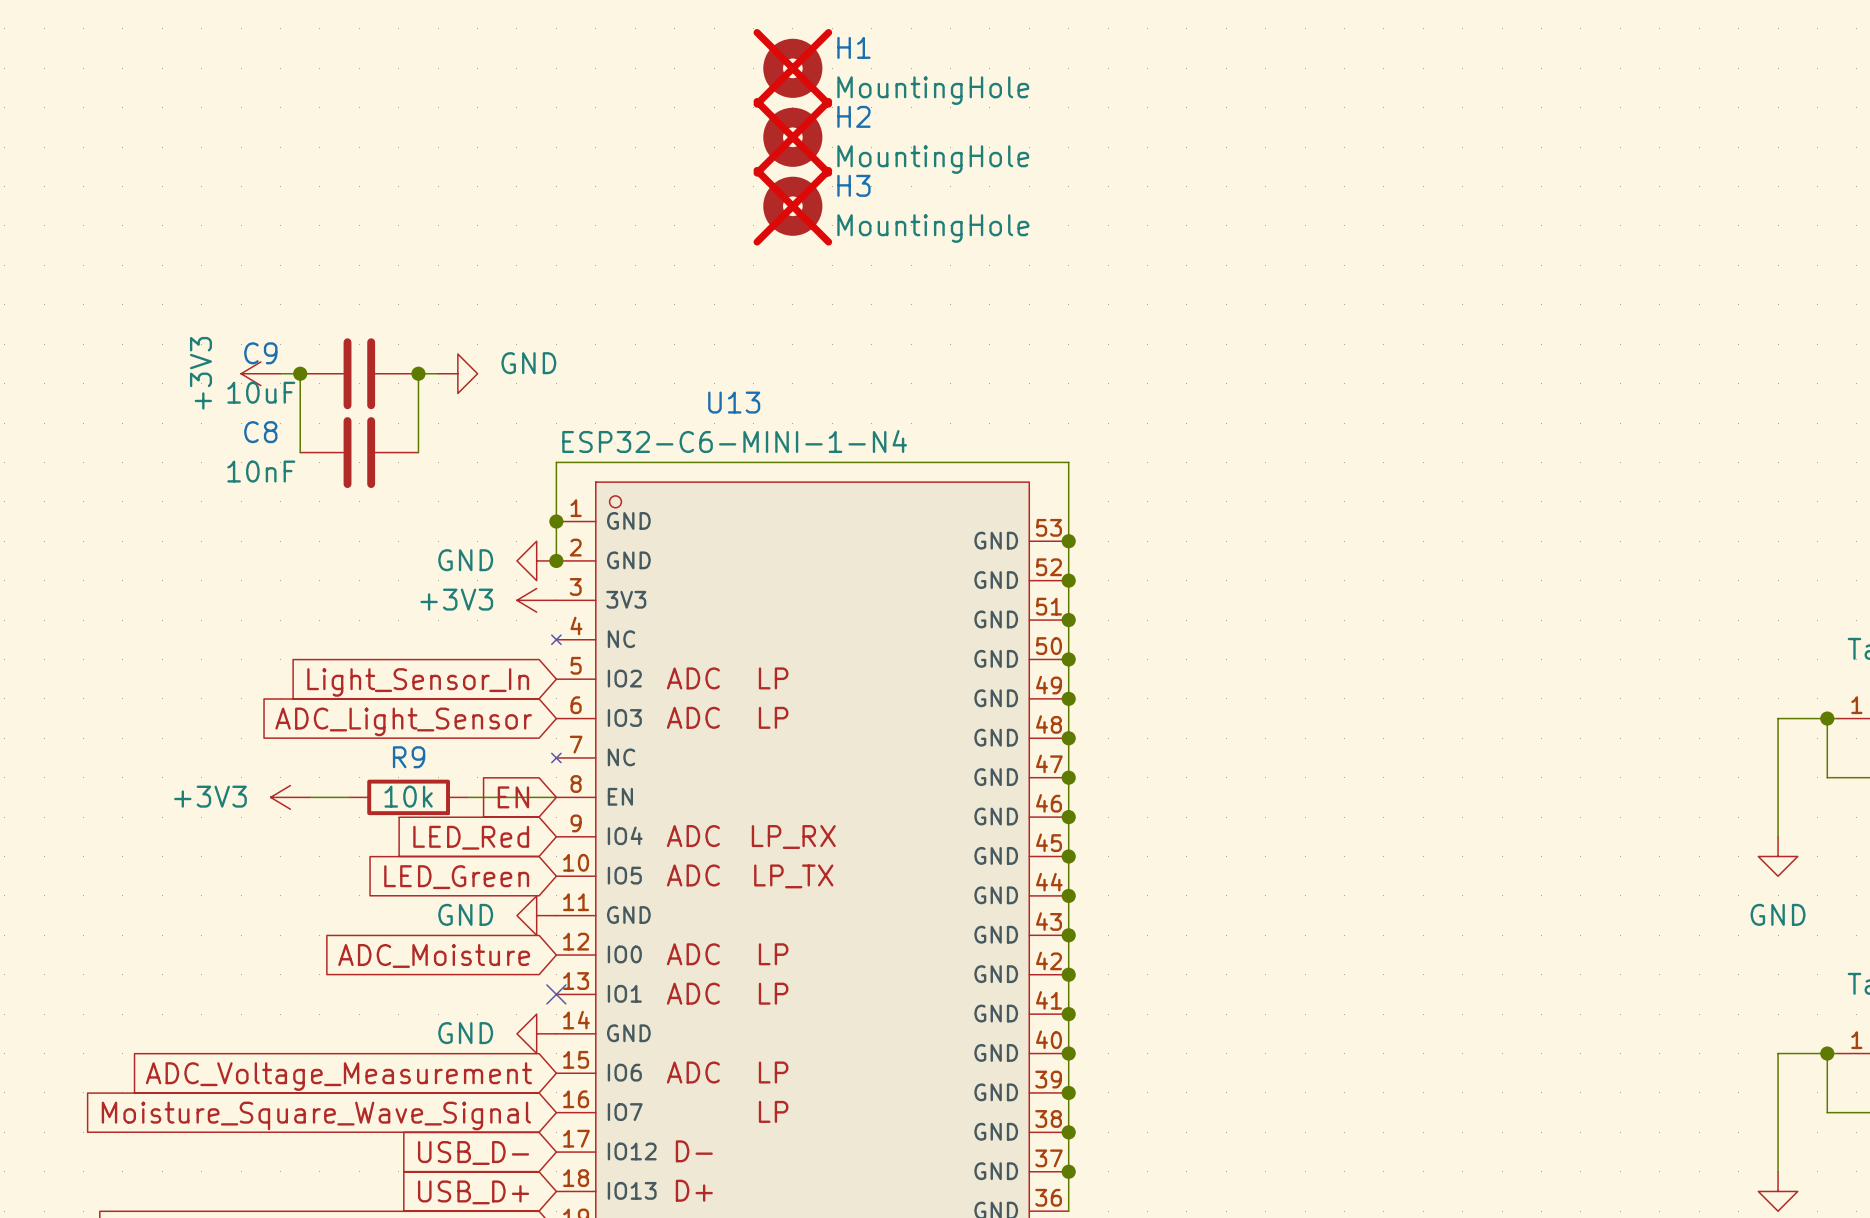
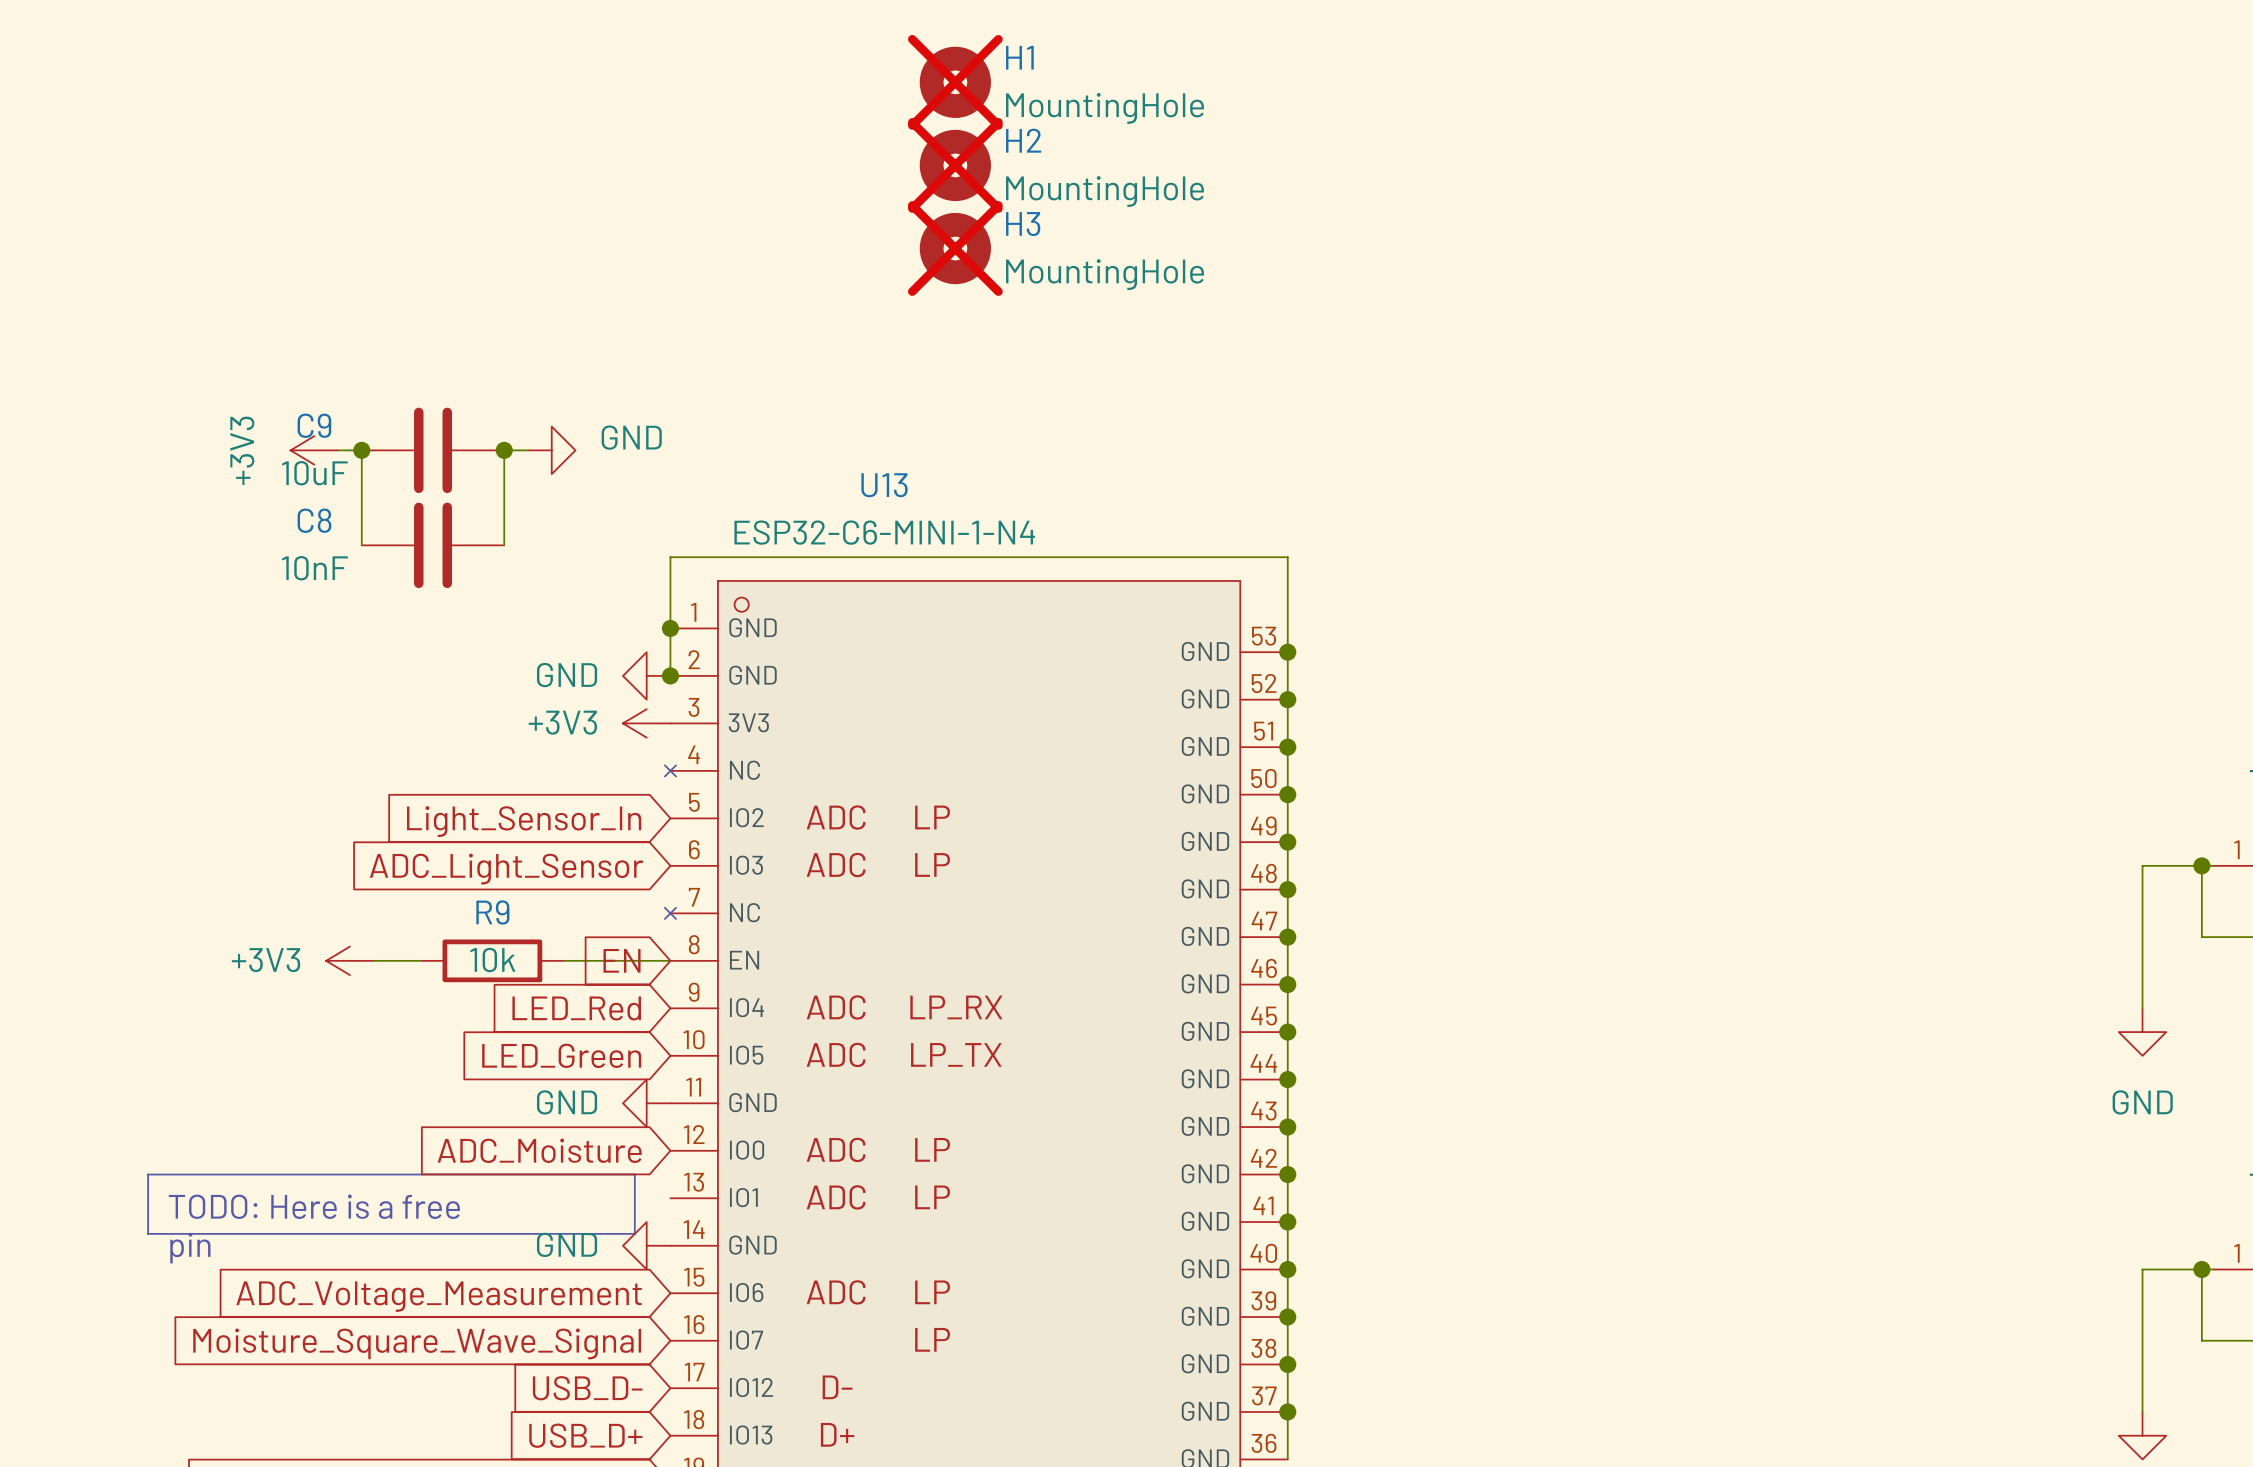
line: none -> (148, 1174) (634, 1174) (634, 1233) (148, 1233) (148, 1174)
no-connect mark: (556, 994) -> none
text: none -> TODO: Here is a free (314, 1206)
text: none -> pin (190, 1248)

